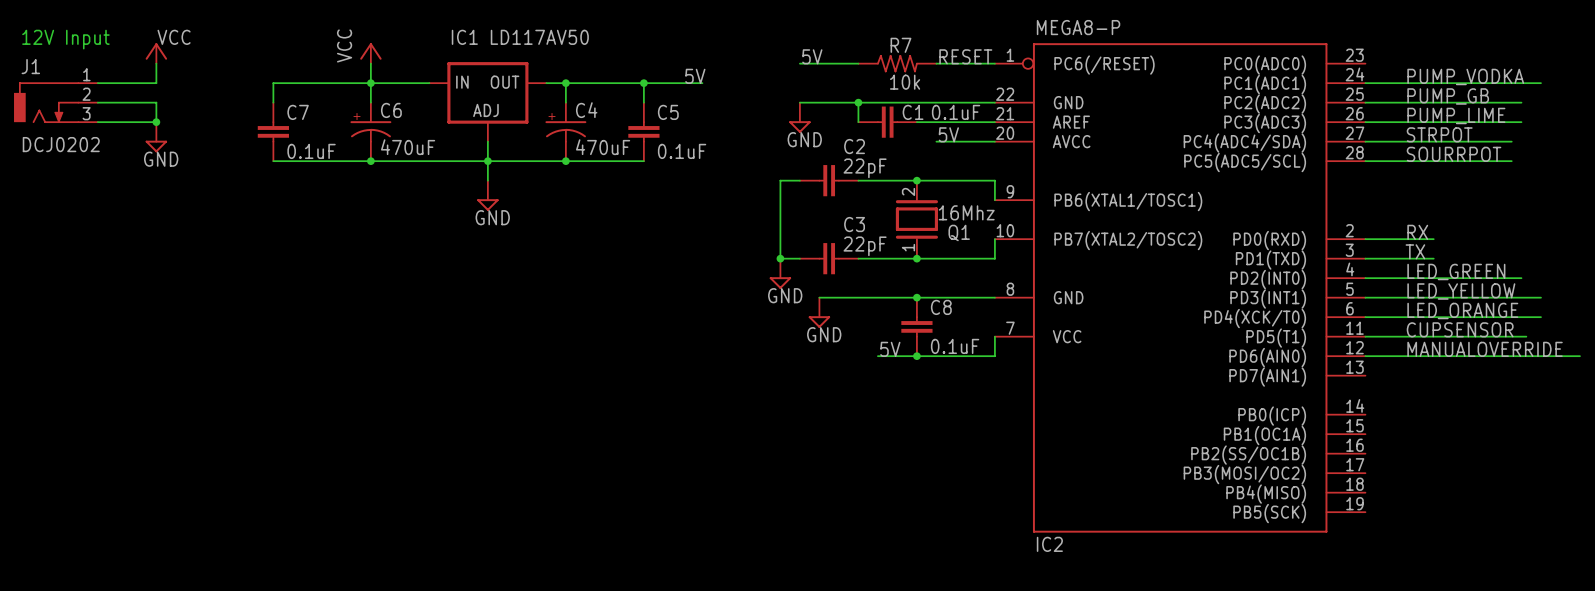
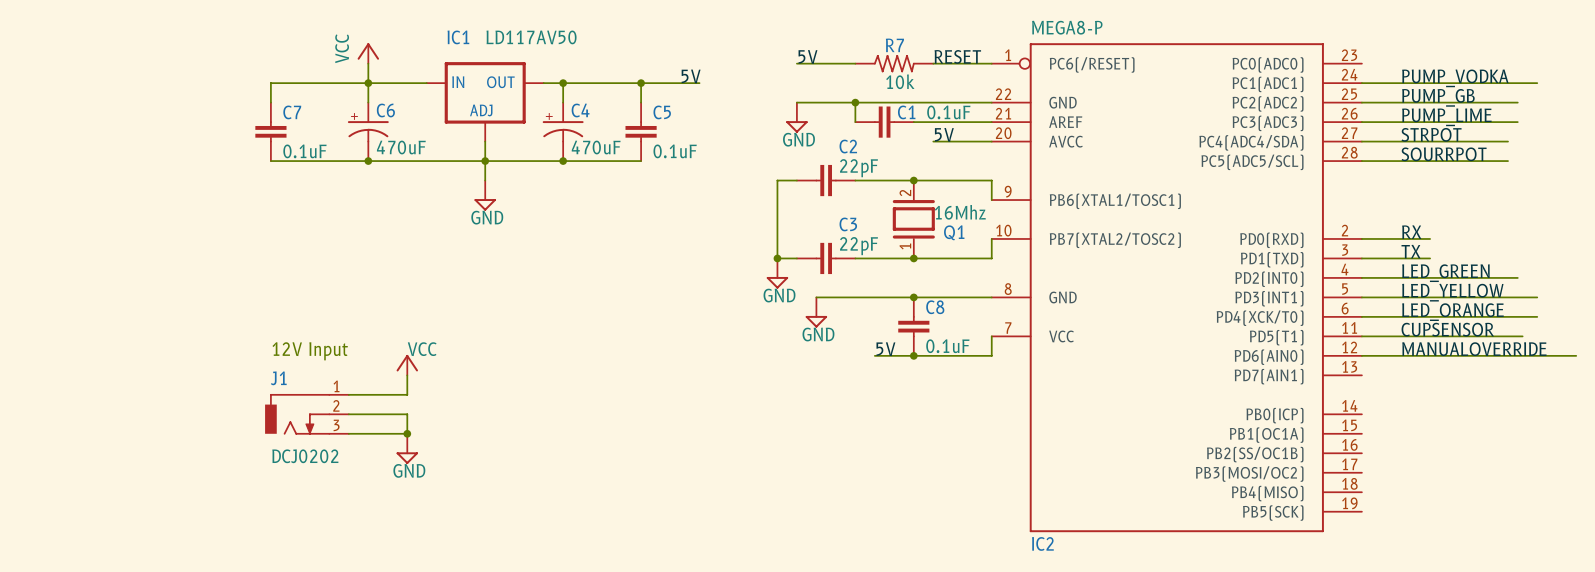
text: 12V Input (65, 39) -> none
power symbol: VCC (156, 53) -> none
wire: (156, 63) (156, 83) (97, 83) -> none
J1 position: (55, 102) -> (306, 414)
wire: (97, 102) (156, 102) (156, 122) (97, 122) -> none
junction: (156, 122) -> none
power symbol: GND (156, 137) -> none
text: none -> 12V Input (310, 351)
power symbol: none -> VCC (407, 365)
wire: none -> (407, 375) (407, 394) (348, 394)
wire: none -> (348, 414) (407, 414) (407, 433) (348, 433)
junction: none -> (407, 433)
power symbol: none -> GND (407, 448)

